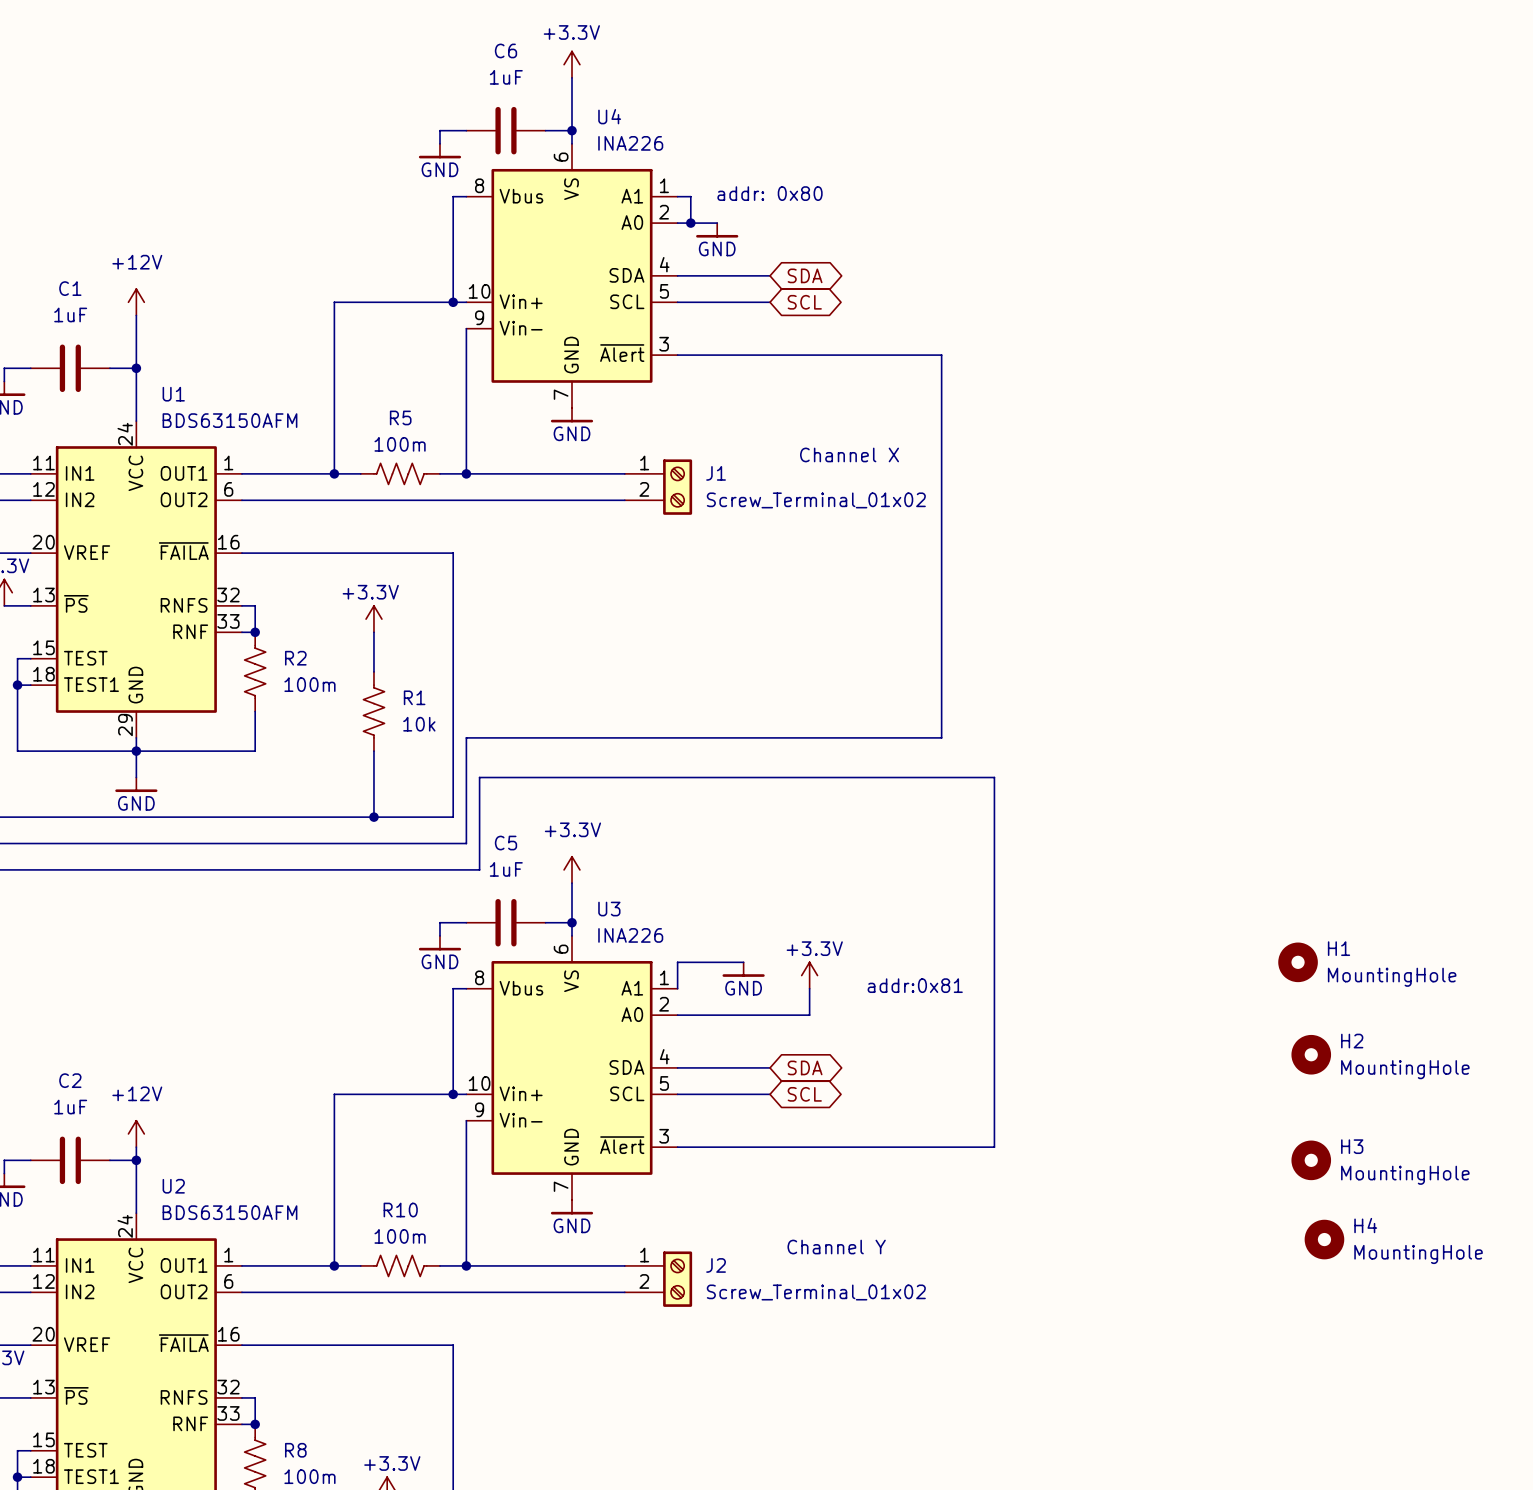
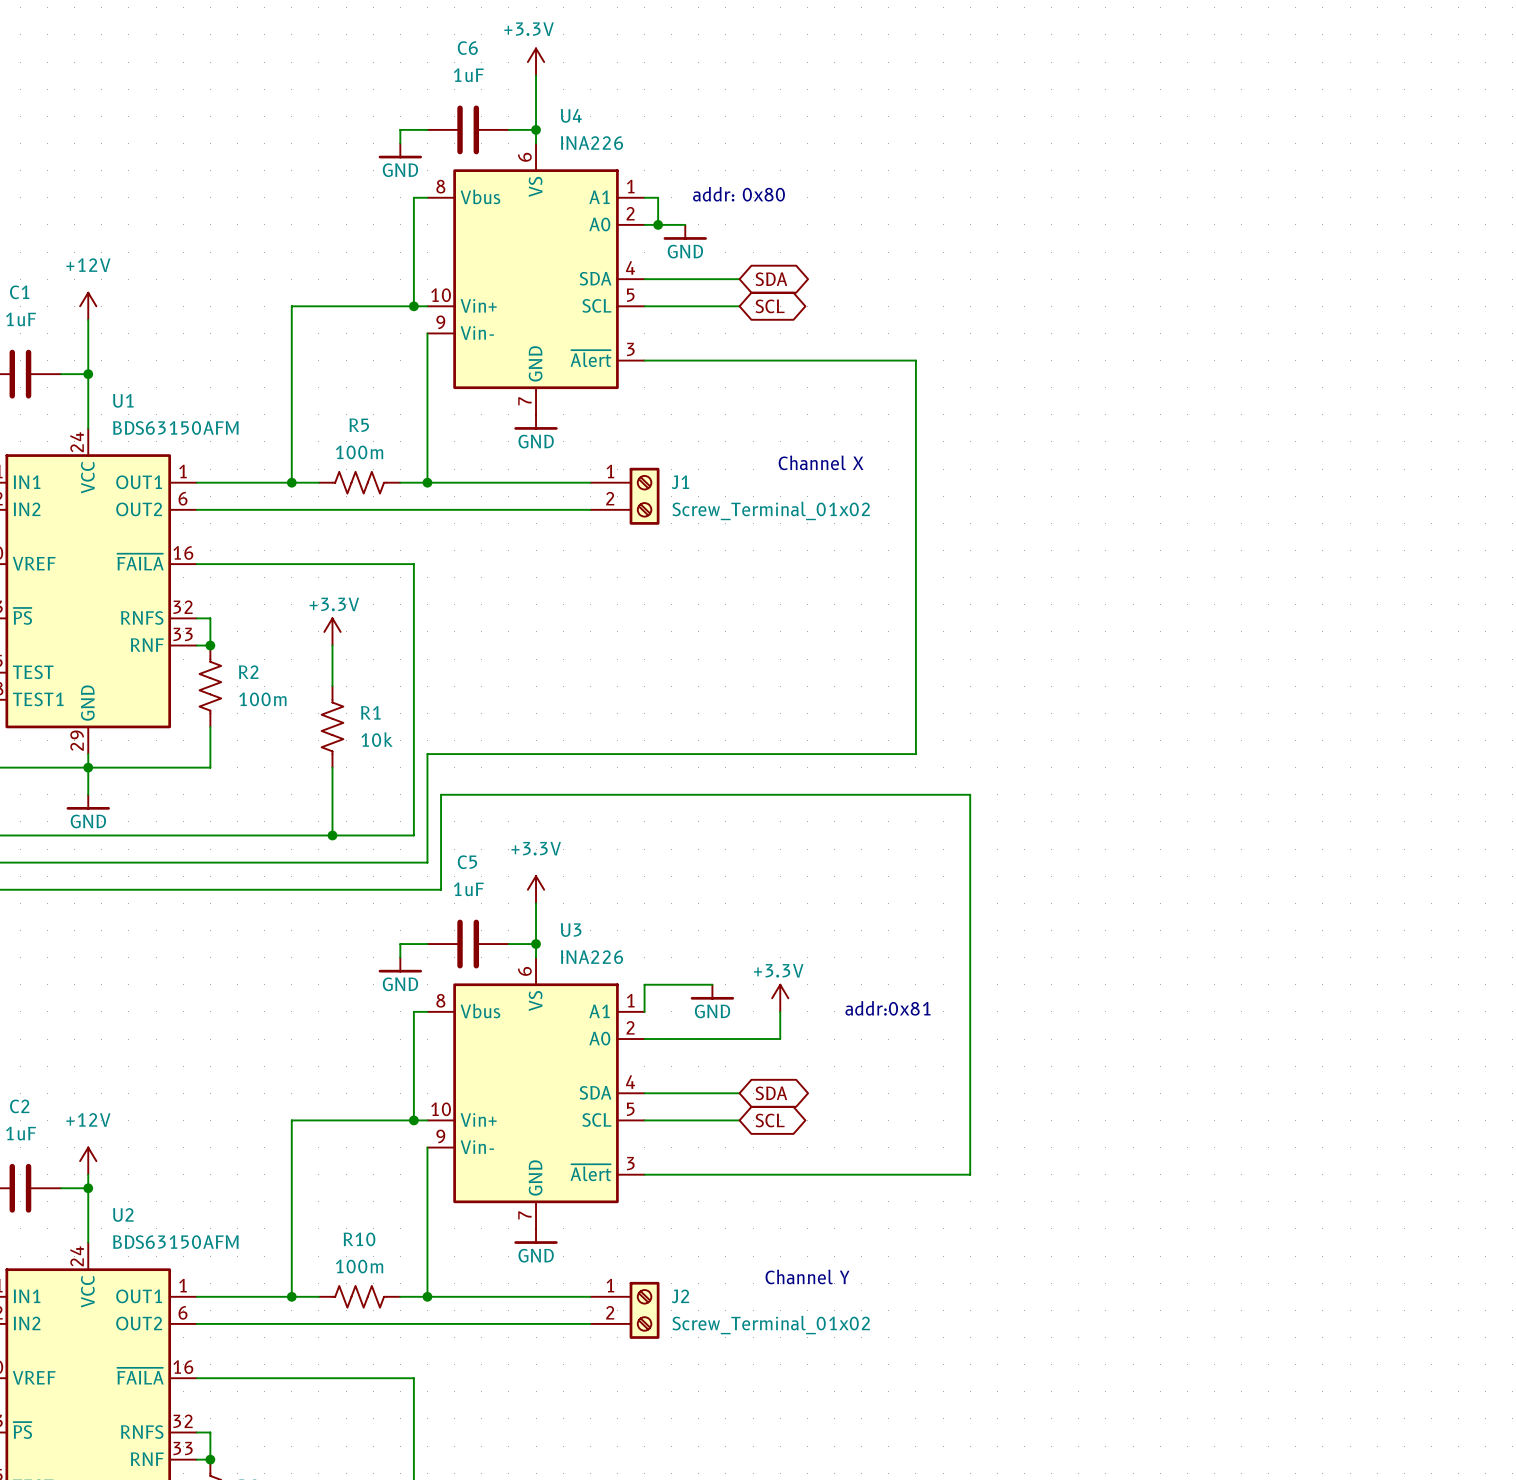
H1: MountingHole (1298, 962) -> none
H2: MountingHole (1311, 1054) -> none
H3: MountingHole (1311, 1160) -> none
H4: MountingHole (1324, 1239) -> none

